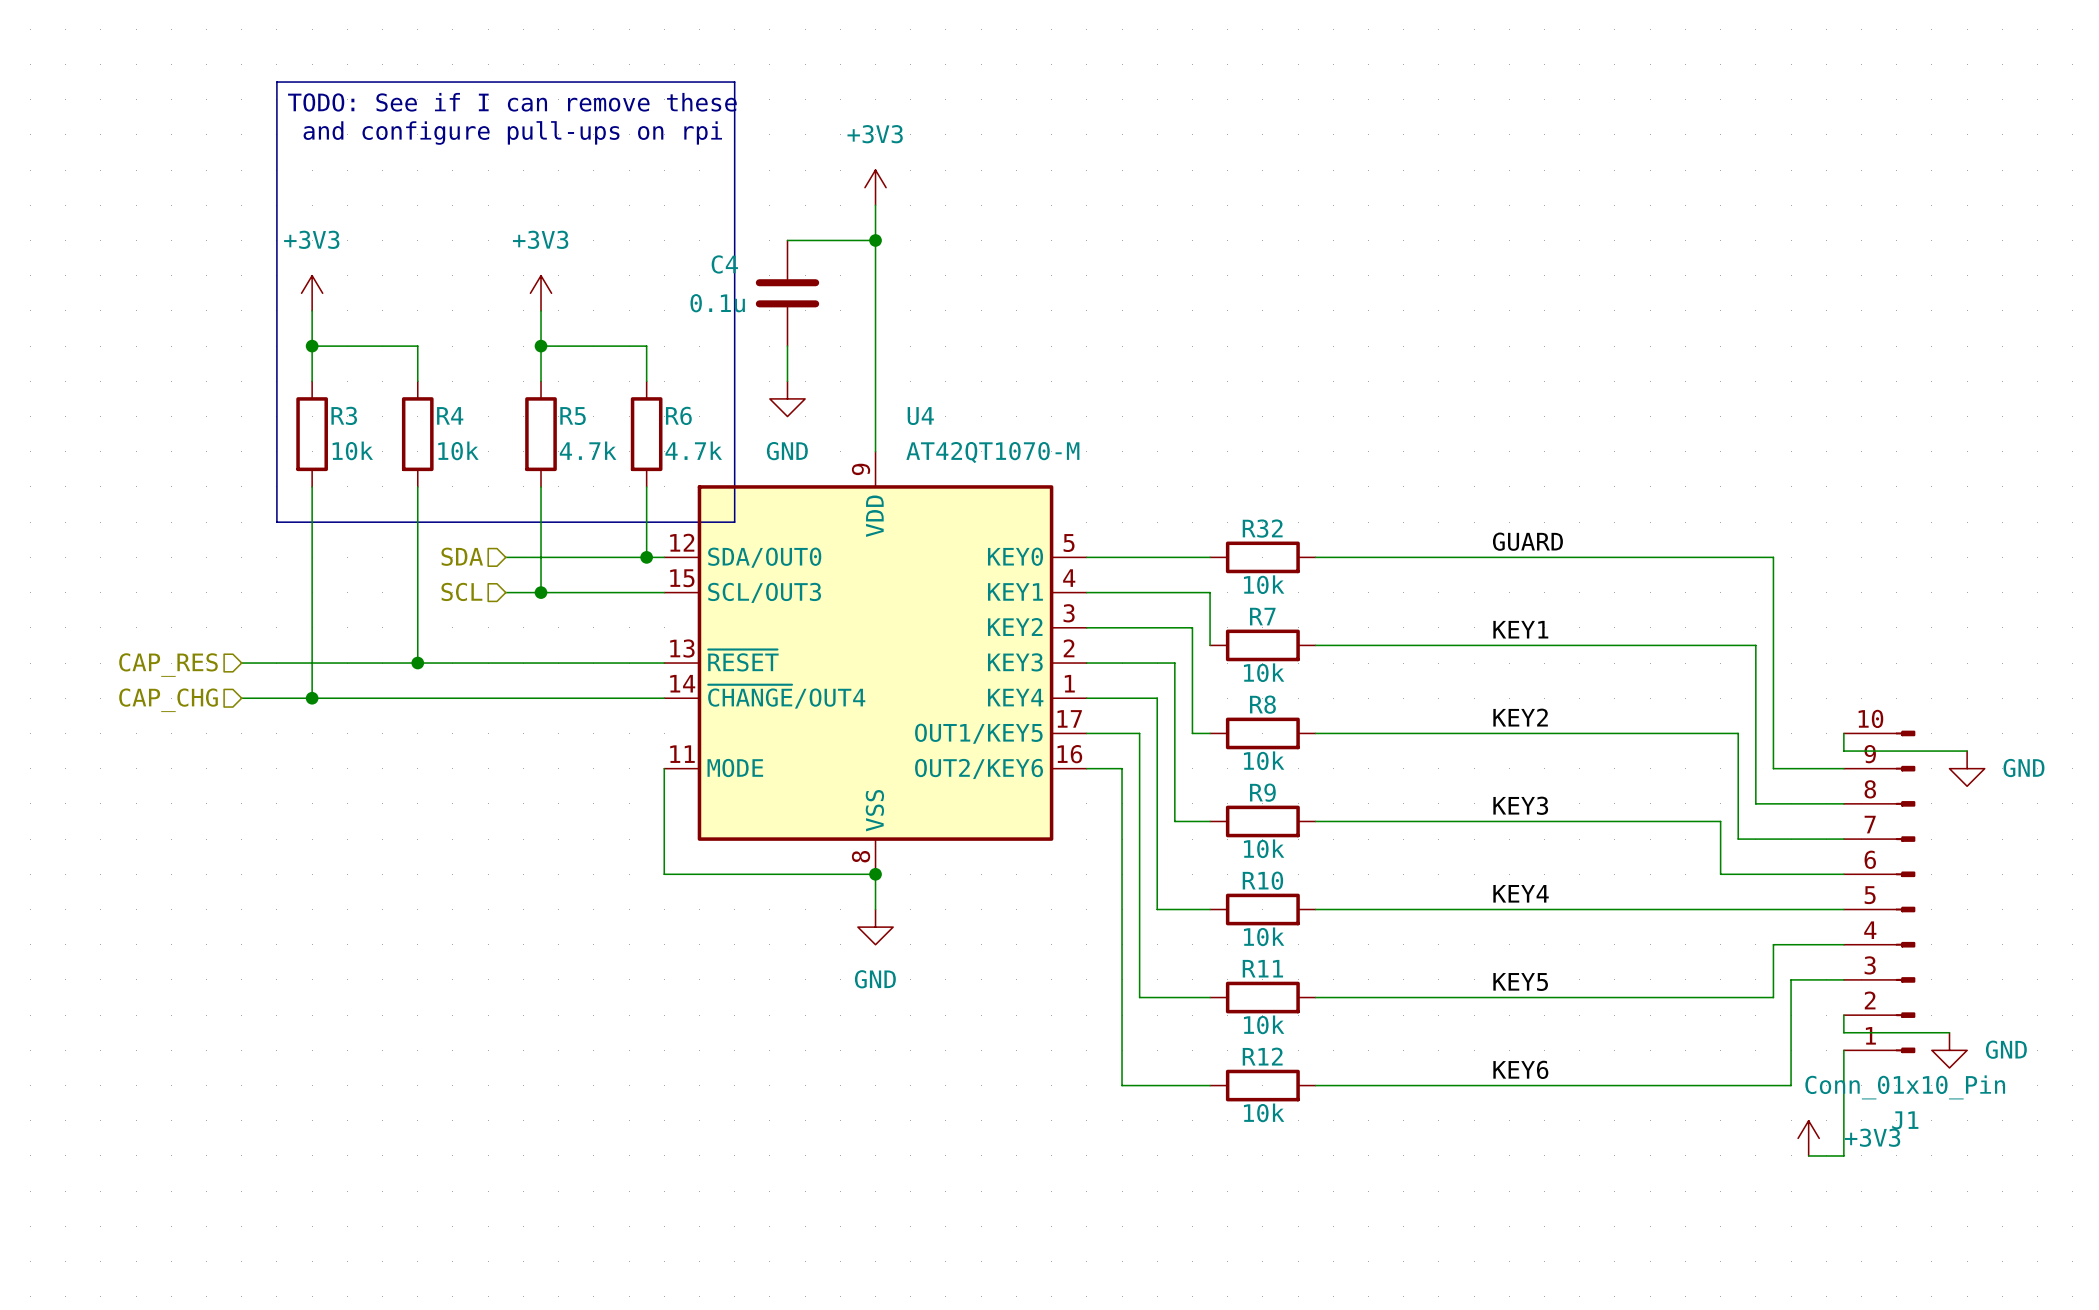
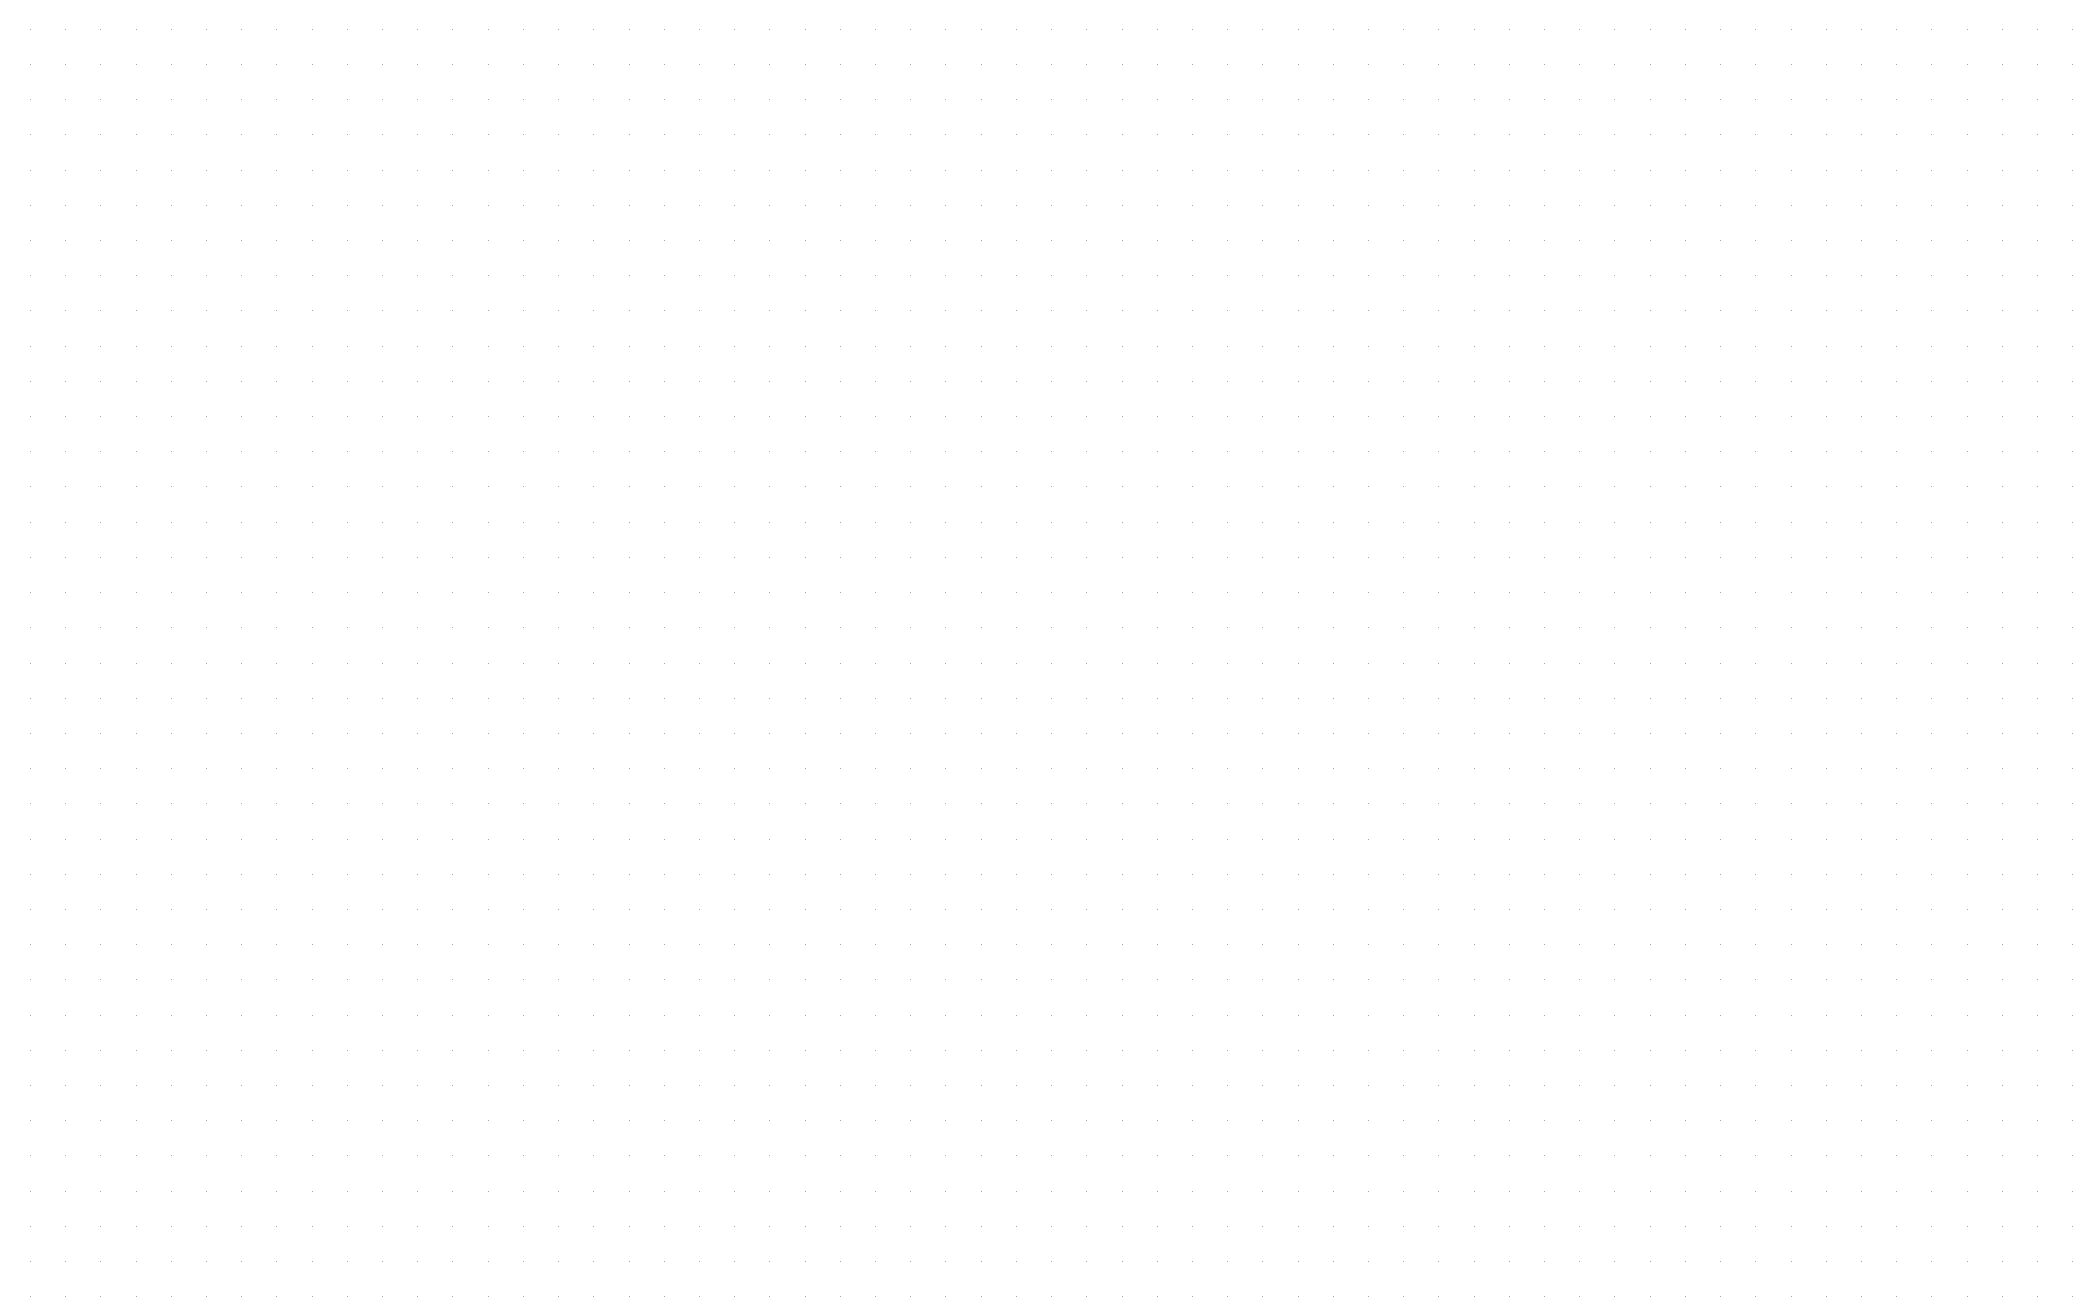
line: (276, 82) (734, 82) (734, 522) (276, 522) (276, 82) -> none
text: TODO: See if I can remove these (512, 102) -> none
text: and configure pull-ups on rpi (512, 132) -> none
power symbol: +3V3 (875, 187) -> none
wire: (875, 205) (875, 451) -> none
wire: (787, 240) (875, 240) -> none
junction: (875, 240) -> none
power symbol: +3V3 (312, 293) -> none
power symbol: +3V3 (541, 293) -> none
C4: 0.1u (787, 293) -> none
wire: (312, 310) (312, 381) -> none
wire: (541, 310) (541, 381) -> none
wire: (312, 346) (417, 346) (417, 381) -> none
junction: (312, 346) -> none
wire: (541, 346) (646, 346) (646, 381) -> none
junction: (541, 346) -> none
wire: (787, 346) (787, 381) -> none
power symbol: GND (787, 398) -> none
R3: 10k (312, 434) -> none
R4: 10k (417, 434) -> none
R5: 4.7k (541, 434) -> none
R6: 4.7k (646, 434) -> none
wire: (312, 486) (312, 698) -> none
wire: (417, 486) (417, 663) -> none
wire: (541, 486) (541, 592) -> none
wire: (646, 486) (646, 557) -> none
label: GUARD (1527, 541) -> none
hierarchical label: SDA (462, 556) -> none
wire: (505, 557) (664, 557) -> none
junction: (646, 557) -> none
wire: (1086, 557) (1210, 557) -> none
R32: 10k (1262, 557) -> none
wire: (1315, 557) (1773, 557) (1773, 768) (1843, 768) -> none
hierarchical label: SCL (461, 591) -> none
wire: (505, 592) (664, 592) -> none
junction: (541, 592) -> none
wire: (1086, 592) (1210, 592) (1210, 645) -> none
wire: (1086, 627) (1192, 627) (1192, 733) (1210, 733) -> none
label: KEY1 (1520, 629) -> none
R7: 10k (1262, 645) -> none
wire: (1315, 645) (1755, 645) (1755, 803) (1843, 803) -> none
wire: (241, 663) (664, 663) -> none
junction: (417, 663) -> none
U4: AT42QT1070-M (875, 663) -> none
wire: (1086, 663) (1174, 663) (1174, 821) (1210, 821) -> none
hierarchical label: CAP_RES (168, 665) -> none
wire: (241, 698) (664, 698) -> none
junction: (312, 698) -> none
wire: (1086, 698) (1157, 698) (1157, 909) (1210, 909) -> none
hierarchical label: CAP_CHG (168, 700) -> none
label: KEY2 (1520, 717) -> none
wire: (1086, 733) (1139, 733) (1139, 997) (1210, 997) -> none
R8: 10k (1262, 733) -> none
wire: (1315, 733) (1738, 733) (1738, 839) (1843, 839) -> none
wire: (1843, 733) (1843, 751) (1967, 751) -> none
wire: (664, 768) (664, 874) (875, 874) (875, 909) -> none
wire: (1086, 768) (1122, 768) (1122, 1085) (1210, 1085) -> none
power symbol: GND (1967, 768) -> none
label: KEY3 (1520, 805) -> none
R9: 10k (1262, 821) -> none
wire: (1315, 821) (1720, 821) (1720, 874) (1843, 874) -> none
junction: (875, 874) -> none
J1: Conn_01x10_Pin (1879, 891) -> none
label: KEY4 (1521, 893) -> none
R10: 10k (1262, 909) -> none
wire: (1315, 909) (1843, 909) -> none
power symbol: GND (875, 927) -> none
wire: (1843, 944) (1773, 944) (1773, 997) (1315, 997) -> none
wire: (1843, 979) (1791, 979) (1791, 1085) (1315, 1085) -> none
label: KEY5 (1520, 981) -> none
R11: 10k (1262, 997) -> none
wire: (1843, 1015) (1843, 1032) (1949, 1032) -> none
wire: (1843, 1050) (1843, 1155) (1808, 1155) -> none
power symbol: GND (1949, 1050) -> none
label: KEY6 (1520, 1069) -> none
R12: 10k (1262, 1085) -> none
power symbol: +3V3 (1808, 1138) -> none

